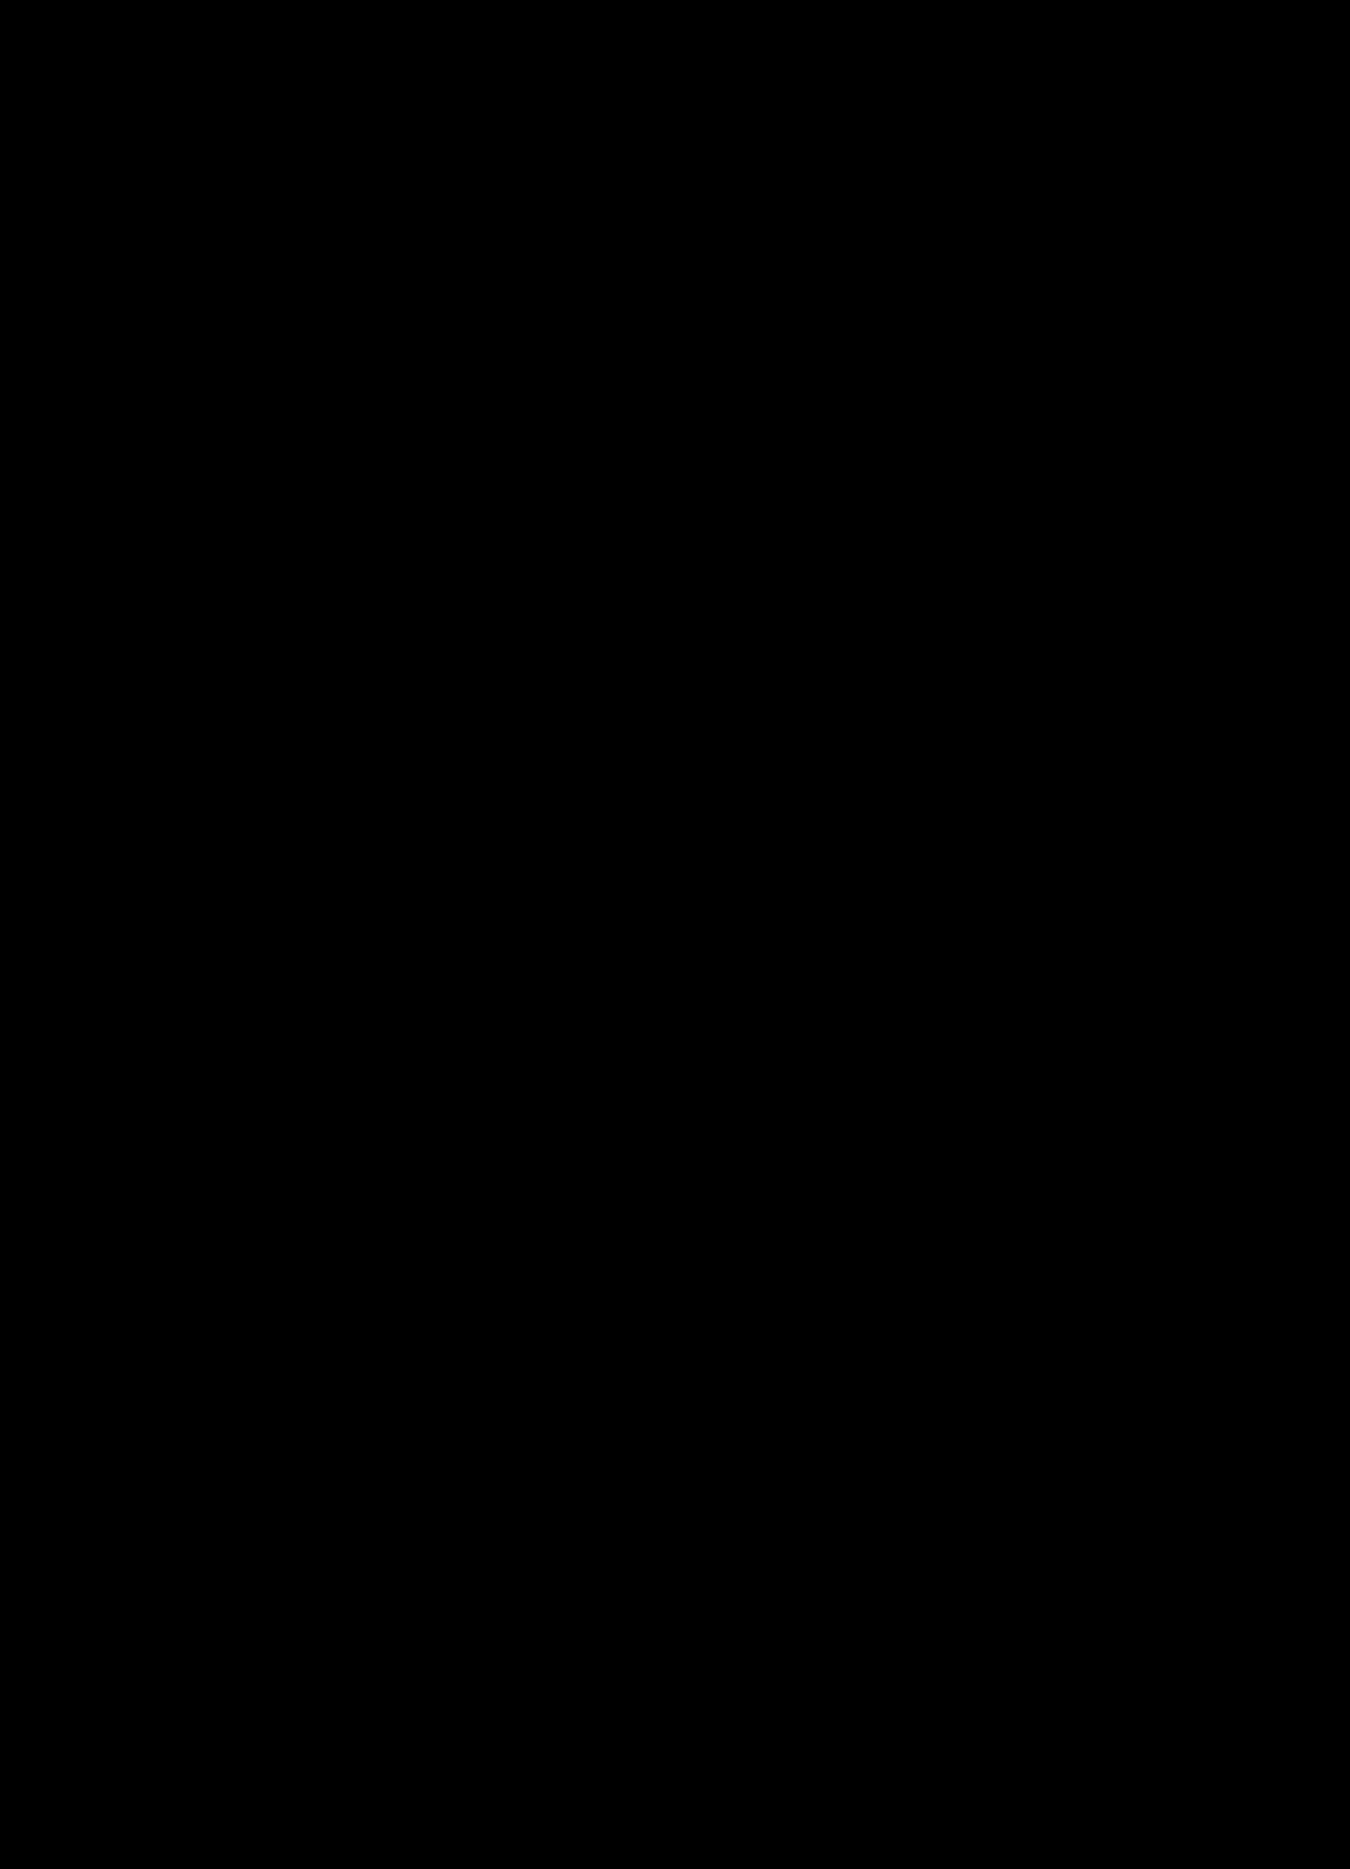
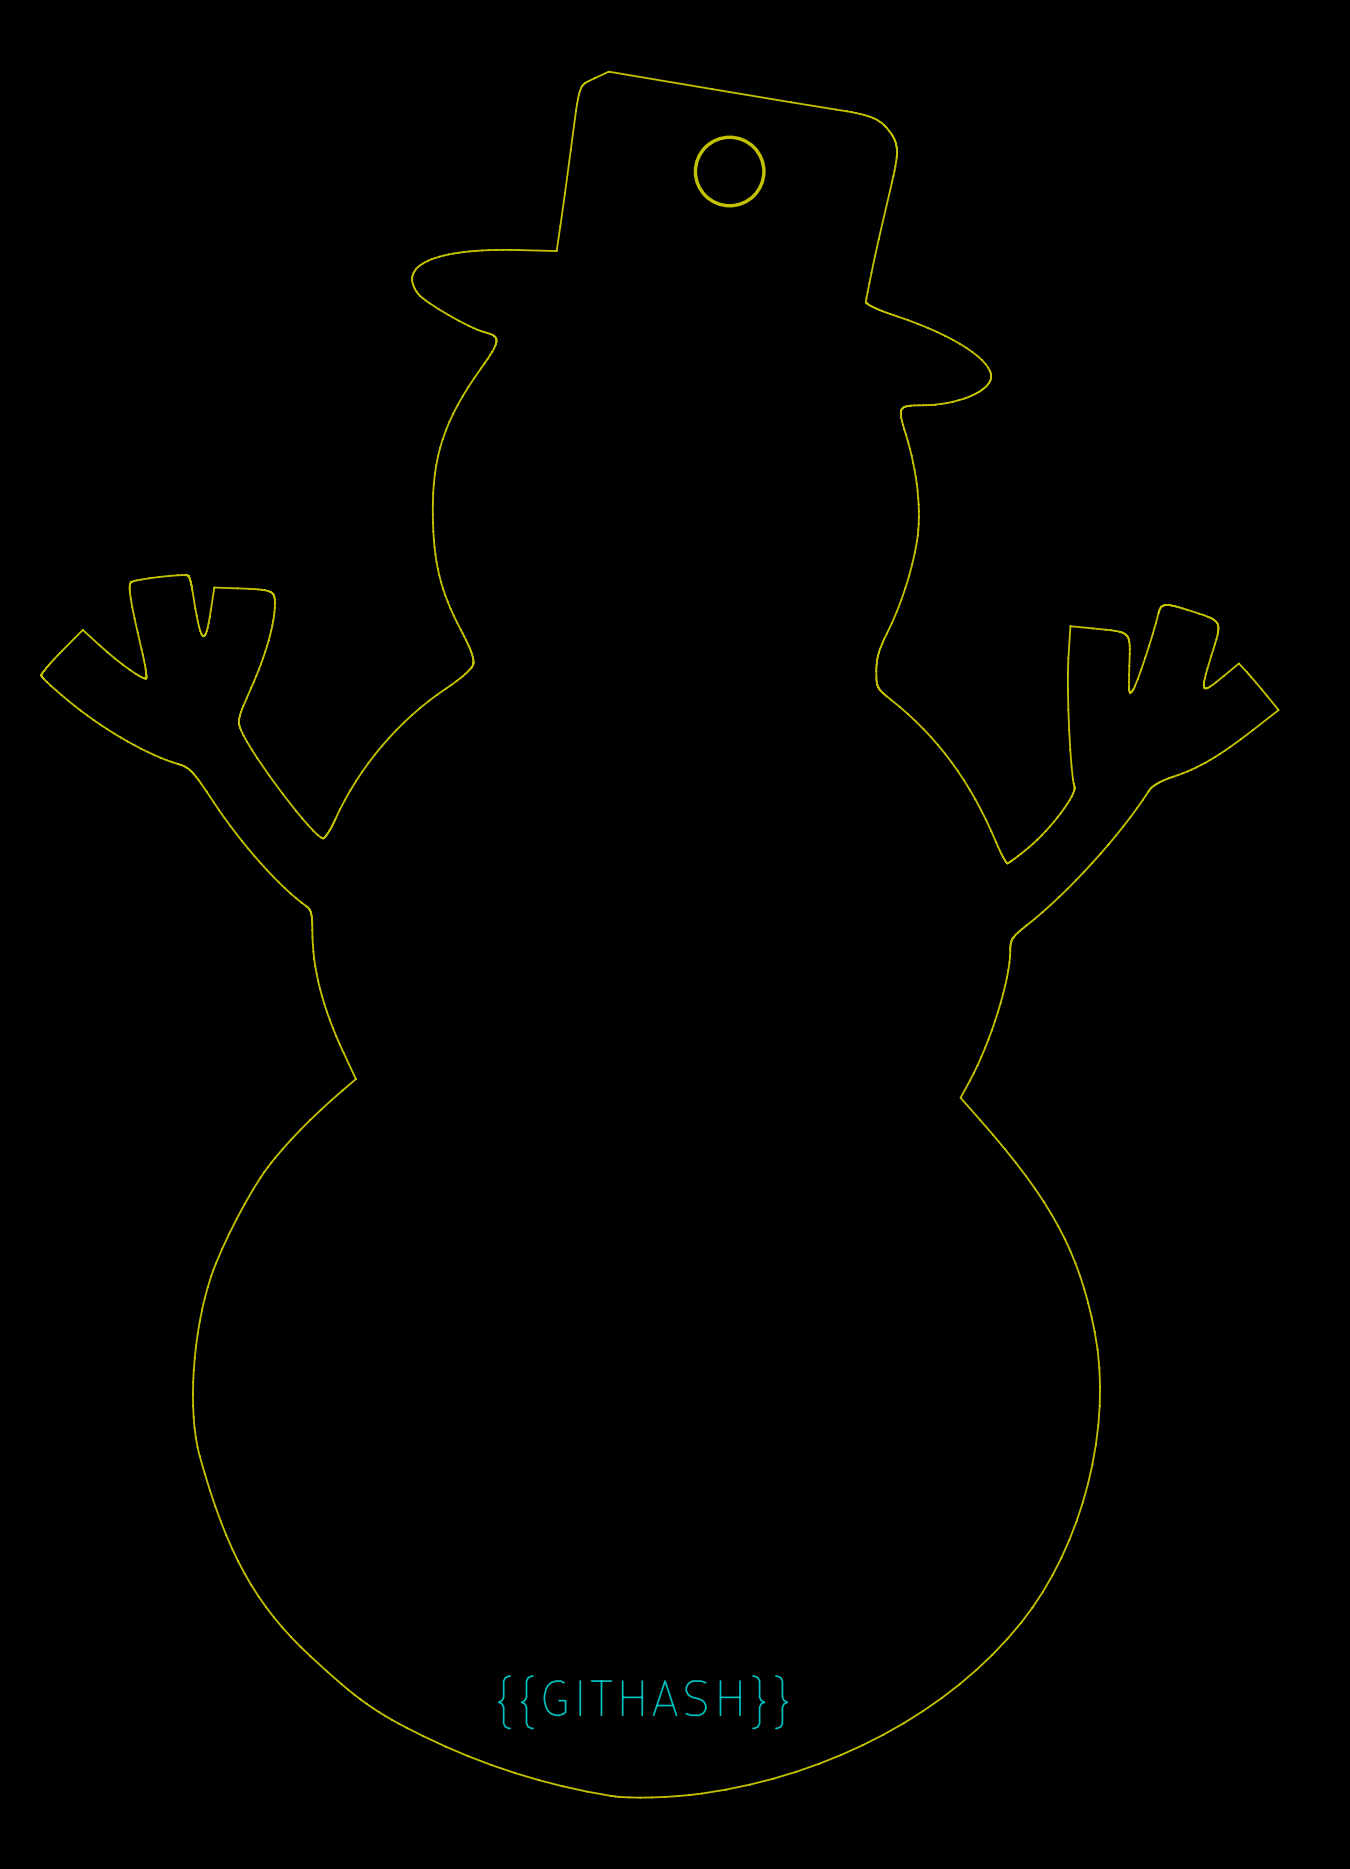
round board edge: none -> [693, 135, 766, 208]
board edge: none -> (865, 301) (896, 156) (894, 139) (881, 123) (870, 116) (851, 112) (608, 71) (583, 84) (577, 104) (556, 251) (495, 249) (453, 253) (425, 262) (416, 268) (412, 274) (413, 286) (422, 298) (459, 320) (492, 335) (496, 339) (492, 351) (462, 396) (449, 421) (440, 447) (433, 483) (433, 531) (437, 568) (445, 595) (469, 647) (473, 663) (463, 675) (412, 715) (381, 746) (356, 781) (324, 837)
board edge: none -> (866, 302) (952, 339) (977, 356) (990, 373) (990, 379) (986, 385) (968, 396) (941, 403) (907, 406) (901, 410) (901, 417) (916, 484) (918, 529) (914, 552) (905, 588) (878, 653) (876, 676) (880, 690) (923, 729) (957, 770) (980, 809) (1007, 863)
board edge: none -> (188, 575) (159, 576) (130, 583) (130, 598) (146, 678)
board edge: none -> (188, 576) (199, 627) (203, 636) (207, 627) (214, 587) (262, 589) (269, 591) (273, 595) (274, 611) (270, 635) (261, 663) (241, 711) (239, 725) (251, 749) (282, 793) (308, 825) (323, 838)
board edge: none -> (41, 675) (82, 629) (122, 664) (145, 678)
board edge: none -> (41, 675) (67, 700) (107, 729) (147, 751) (188, 769) (254, 856) (284, 888) (308, 908) (311, 918) (315, 966) (322, 996) (336, 1036) (355, 1079) (300, 1129) (260, 1177) (222, 1249) (211, 1276) (202, 1309) (196, 1345) (193, 1382) (195, 1437) (215, 1506) (232, 1548) (244, 1573) (265, 1606) (300, 1646) (354, 1694) (392, 1719) (445, 1746) (515, 1773) (587, 1791) (615, 1796) (640, 1797) (702, 1793) (773, 1778) (840, 1755) (903, 1723) (959, 1684) (1007, 1639) (1042, 1591) (1069, 1539) (1088, 1483) (1098, 1425) (1099, 1367) (1094, 1331) (1088, 1302) (1070, 1250) (1043, 1201) (1004, 1149) (960, 1097) (981, 1056) (995, 1021) (1005, 985) (1010, 943) (1013, 936) (1059, 896) (1092, 862) (1123, 826) (1152, 787) (1214, 757) (1278, 710) (1238, 663) (1212, 684) (1204, 688) (1204, 678) (1217, 633) (1217, 624) (1207, 616) (1169, 605) (1163, 605) (1159, 609) (1141, 669) (1130, 692)
board edge: none -> (1129, 692) (1129, 645) (1126, 635) (1115, 630) (1070, 626) (1068, 709) (1074, 790) (1064, 808) (1045, 831) (1028, 847) (1007, 863)
text: none -> {{GITHASH}} (643, 1702)

